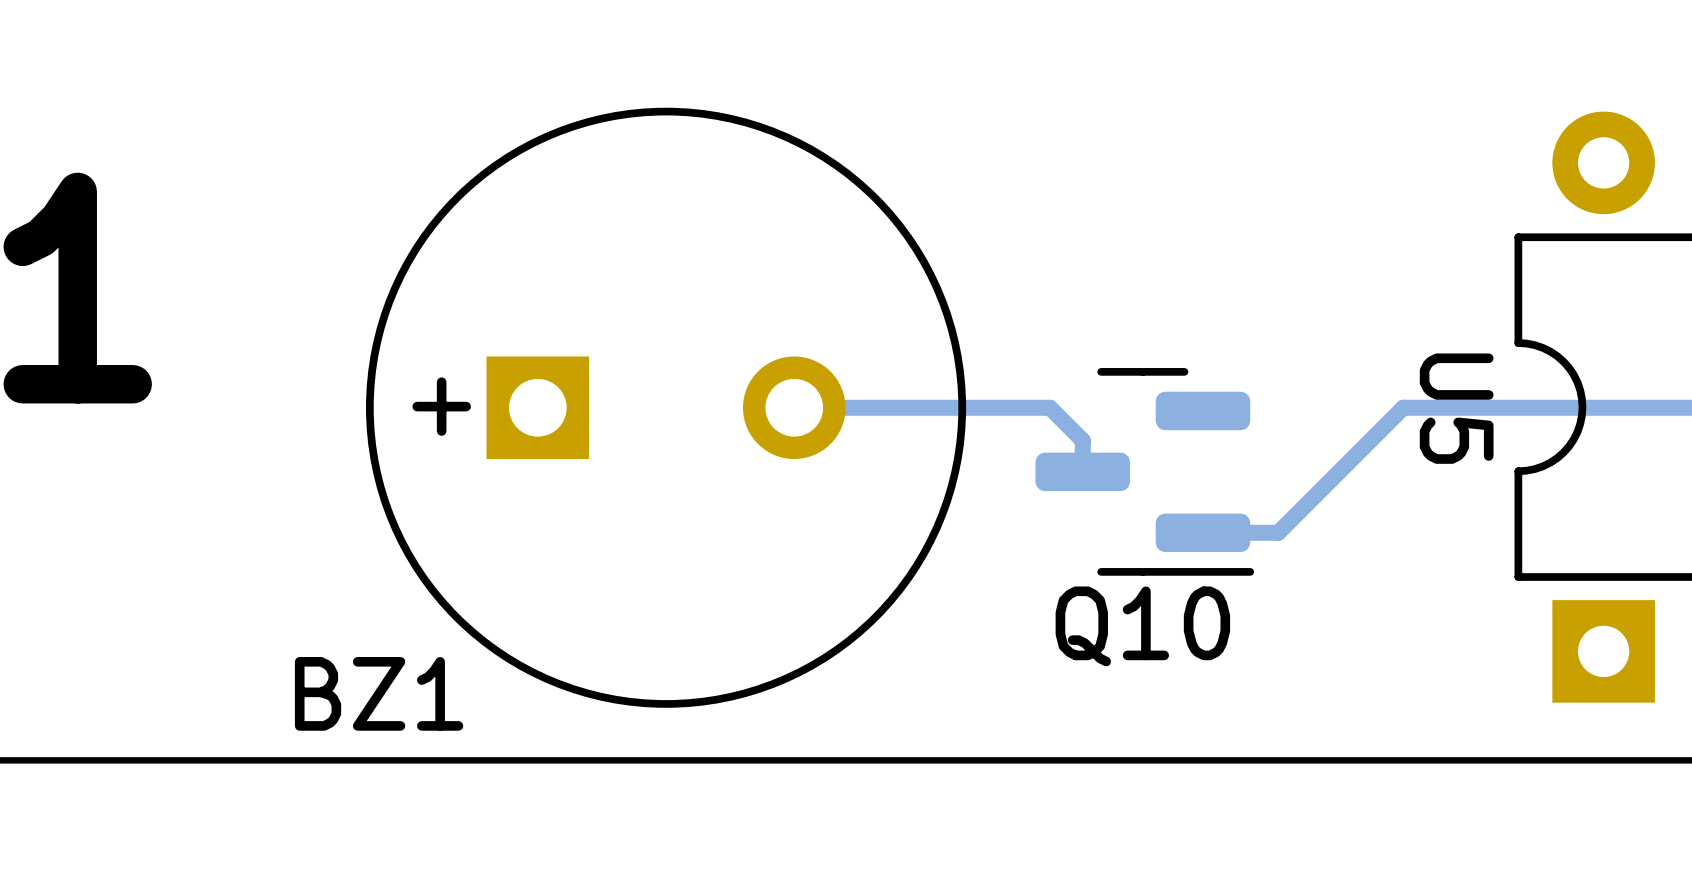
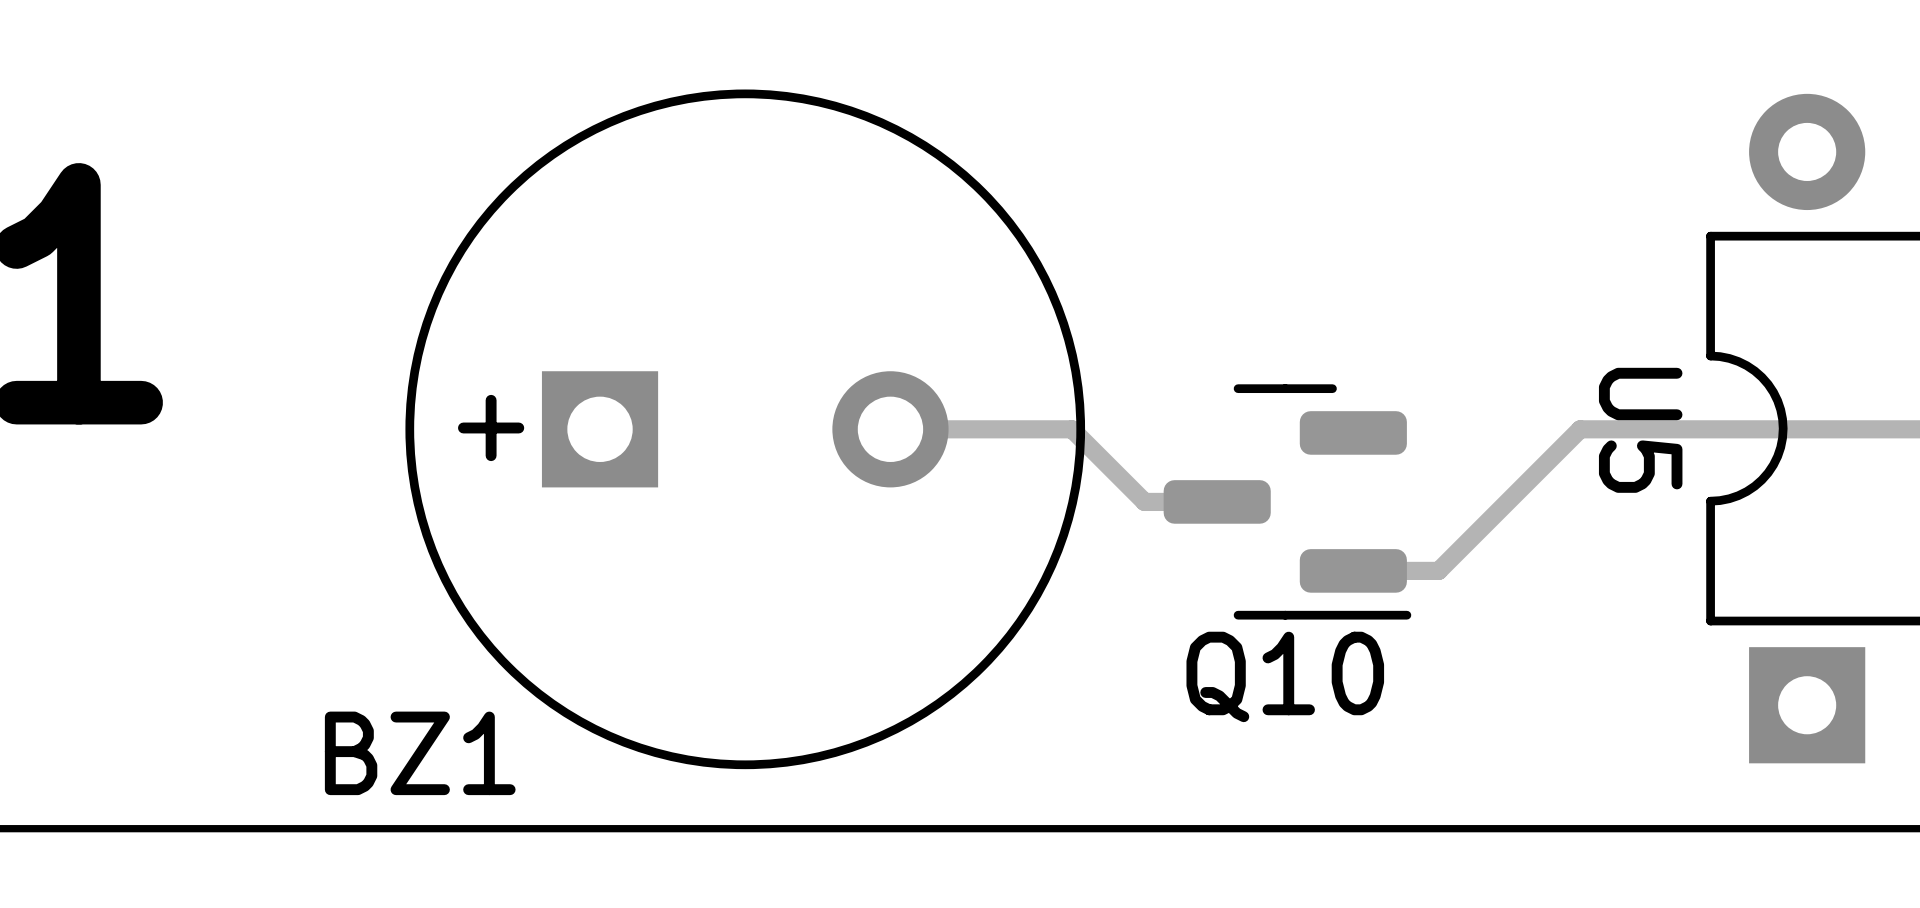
track: (954, 407) (1049, 407) (1082, 440) (1082, 471) -> (1071, 429) (1144, 501) (1217, 501)

